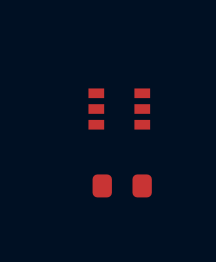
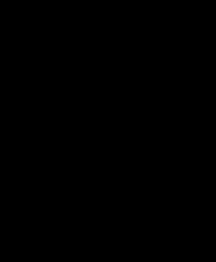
part: (119, 109) -> none
part: (122, 185) -> none

